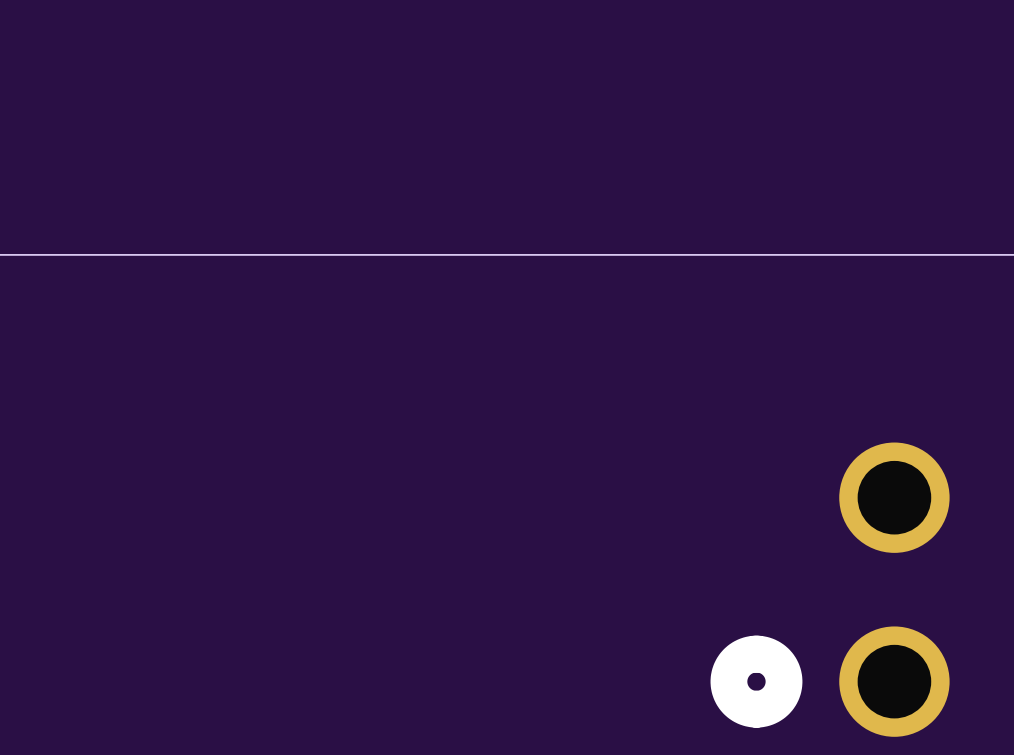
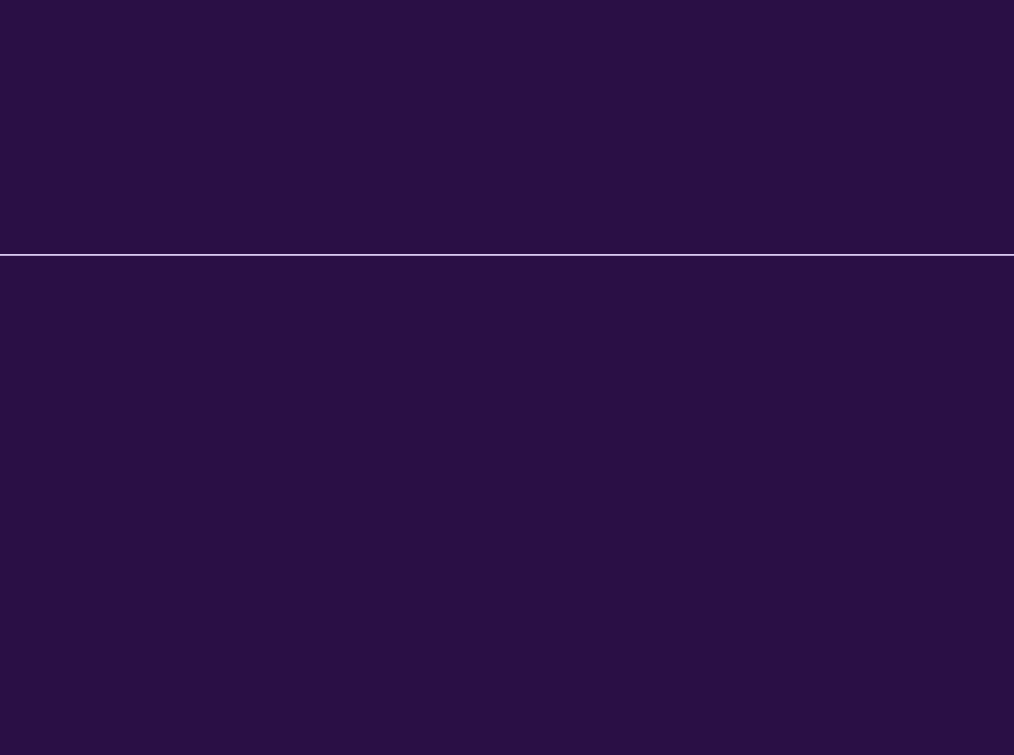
part: (830, 589) -> none

